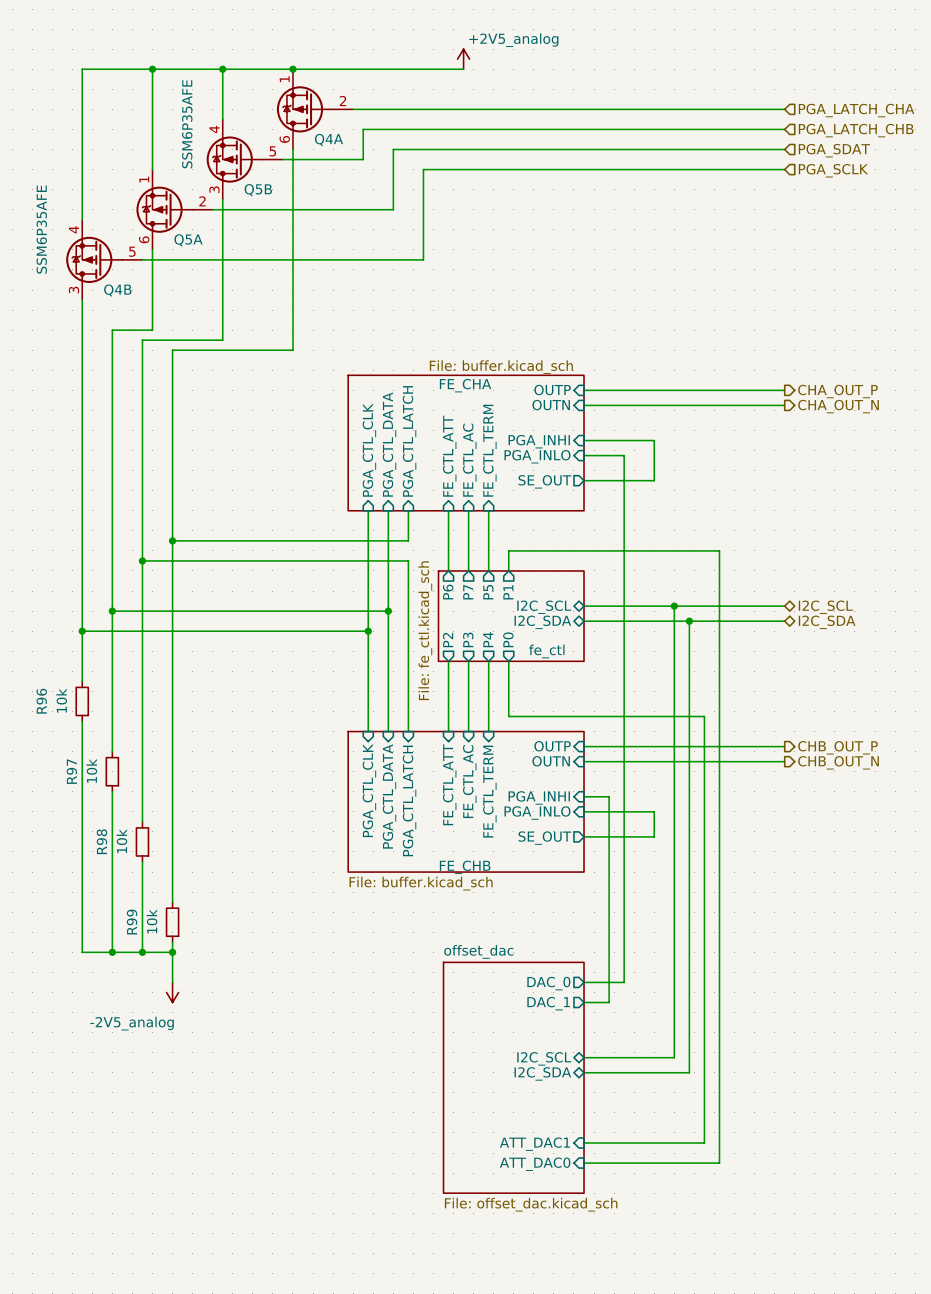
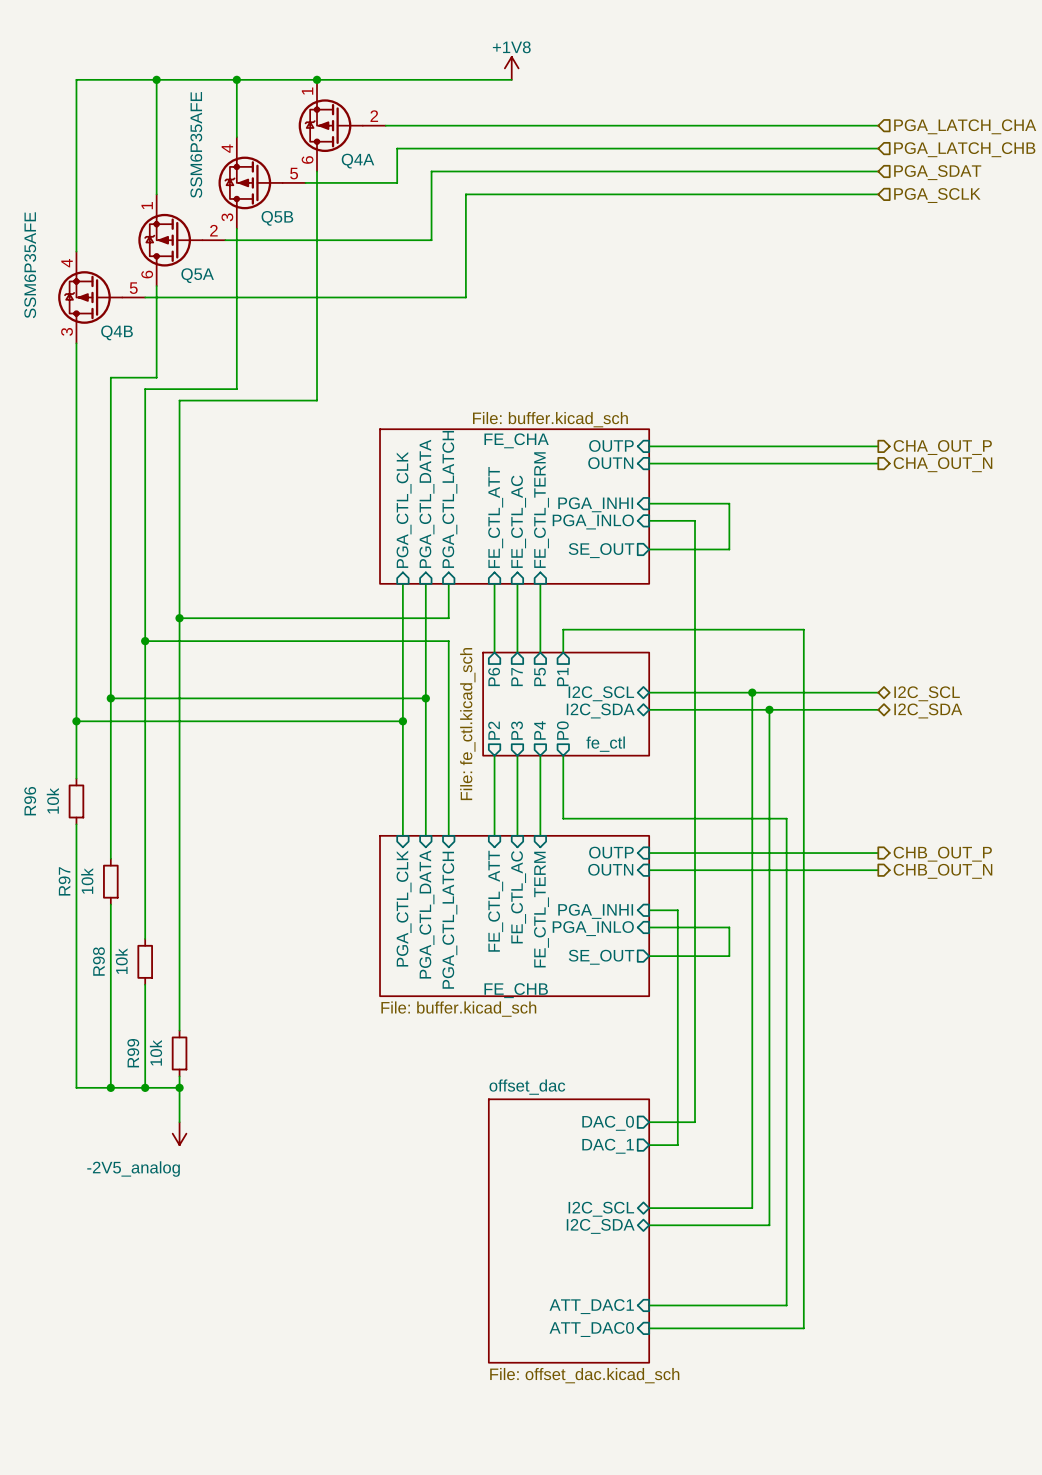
power symbol: +2V5_analog (463, 59) -> +1V8 (511, 68)

